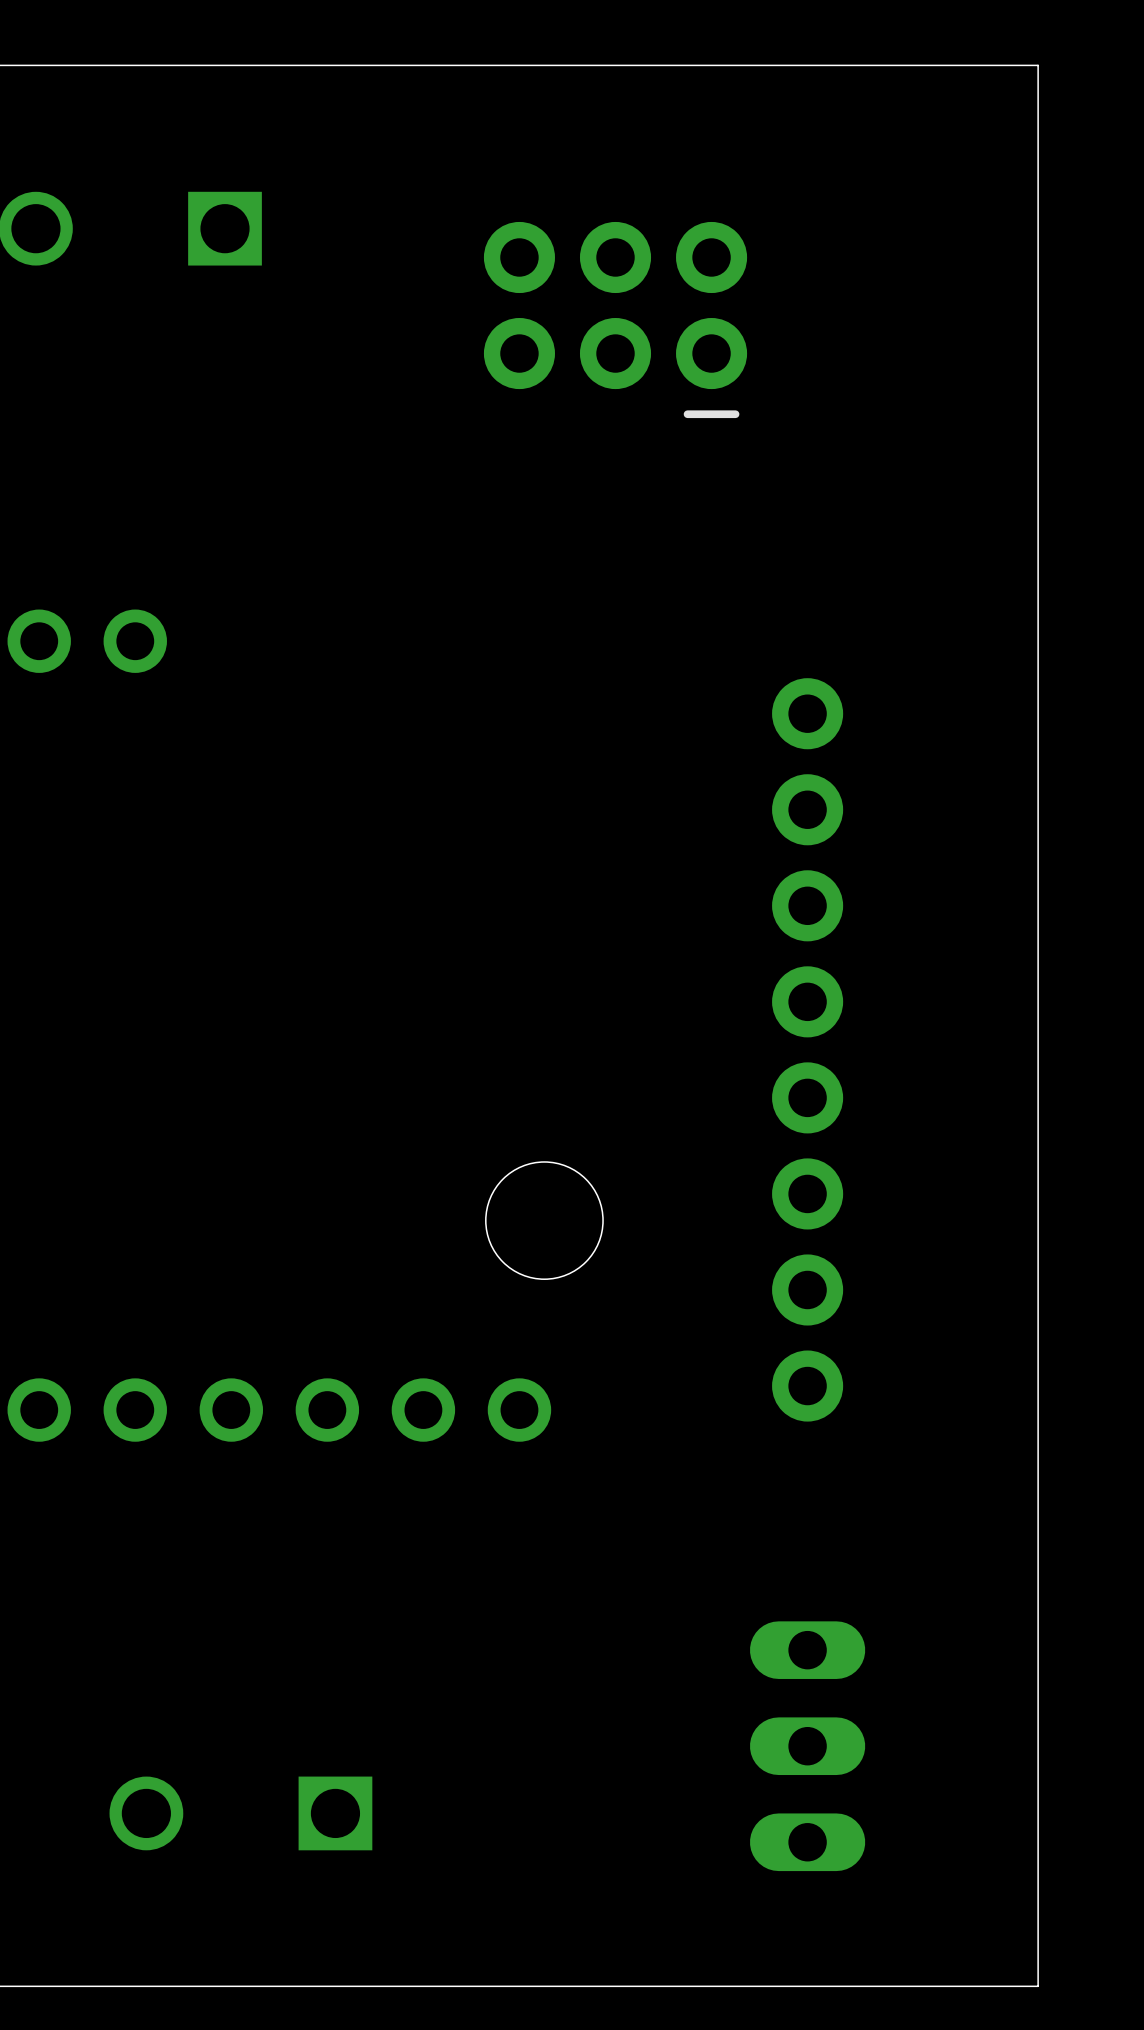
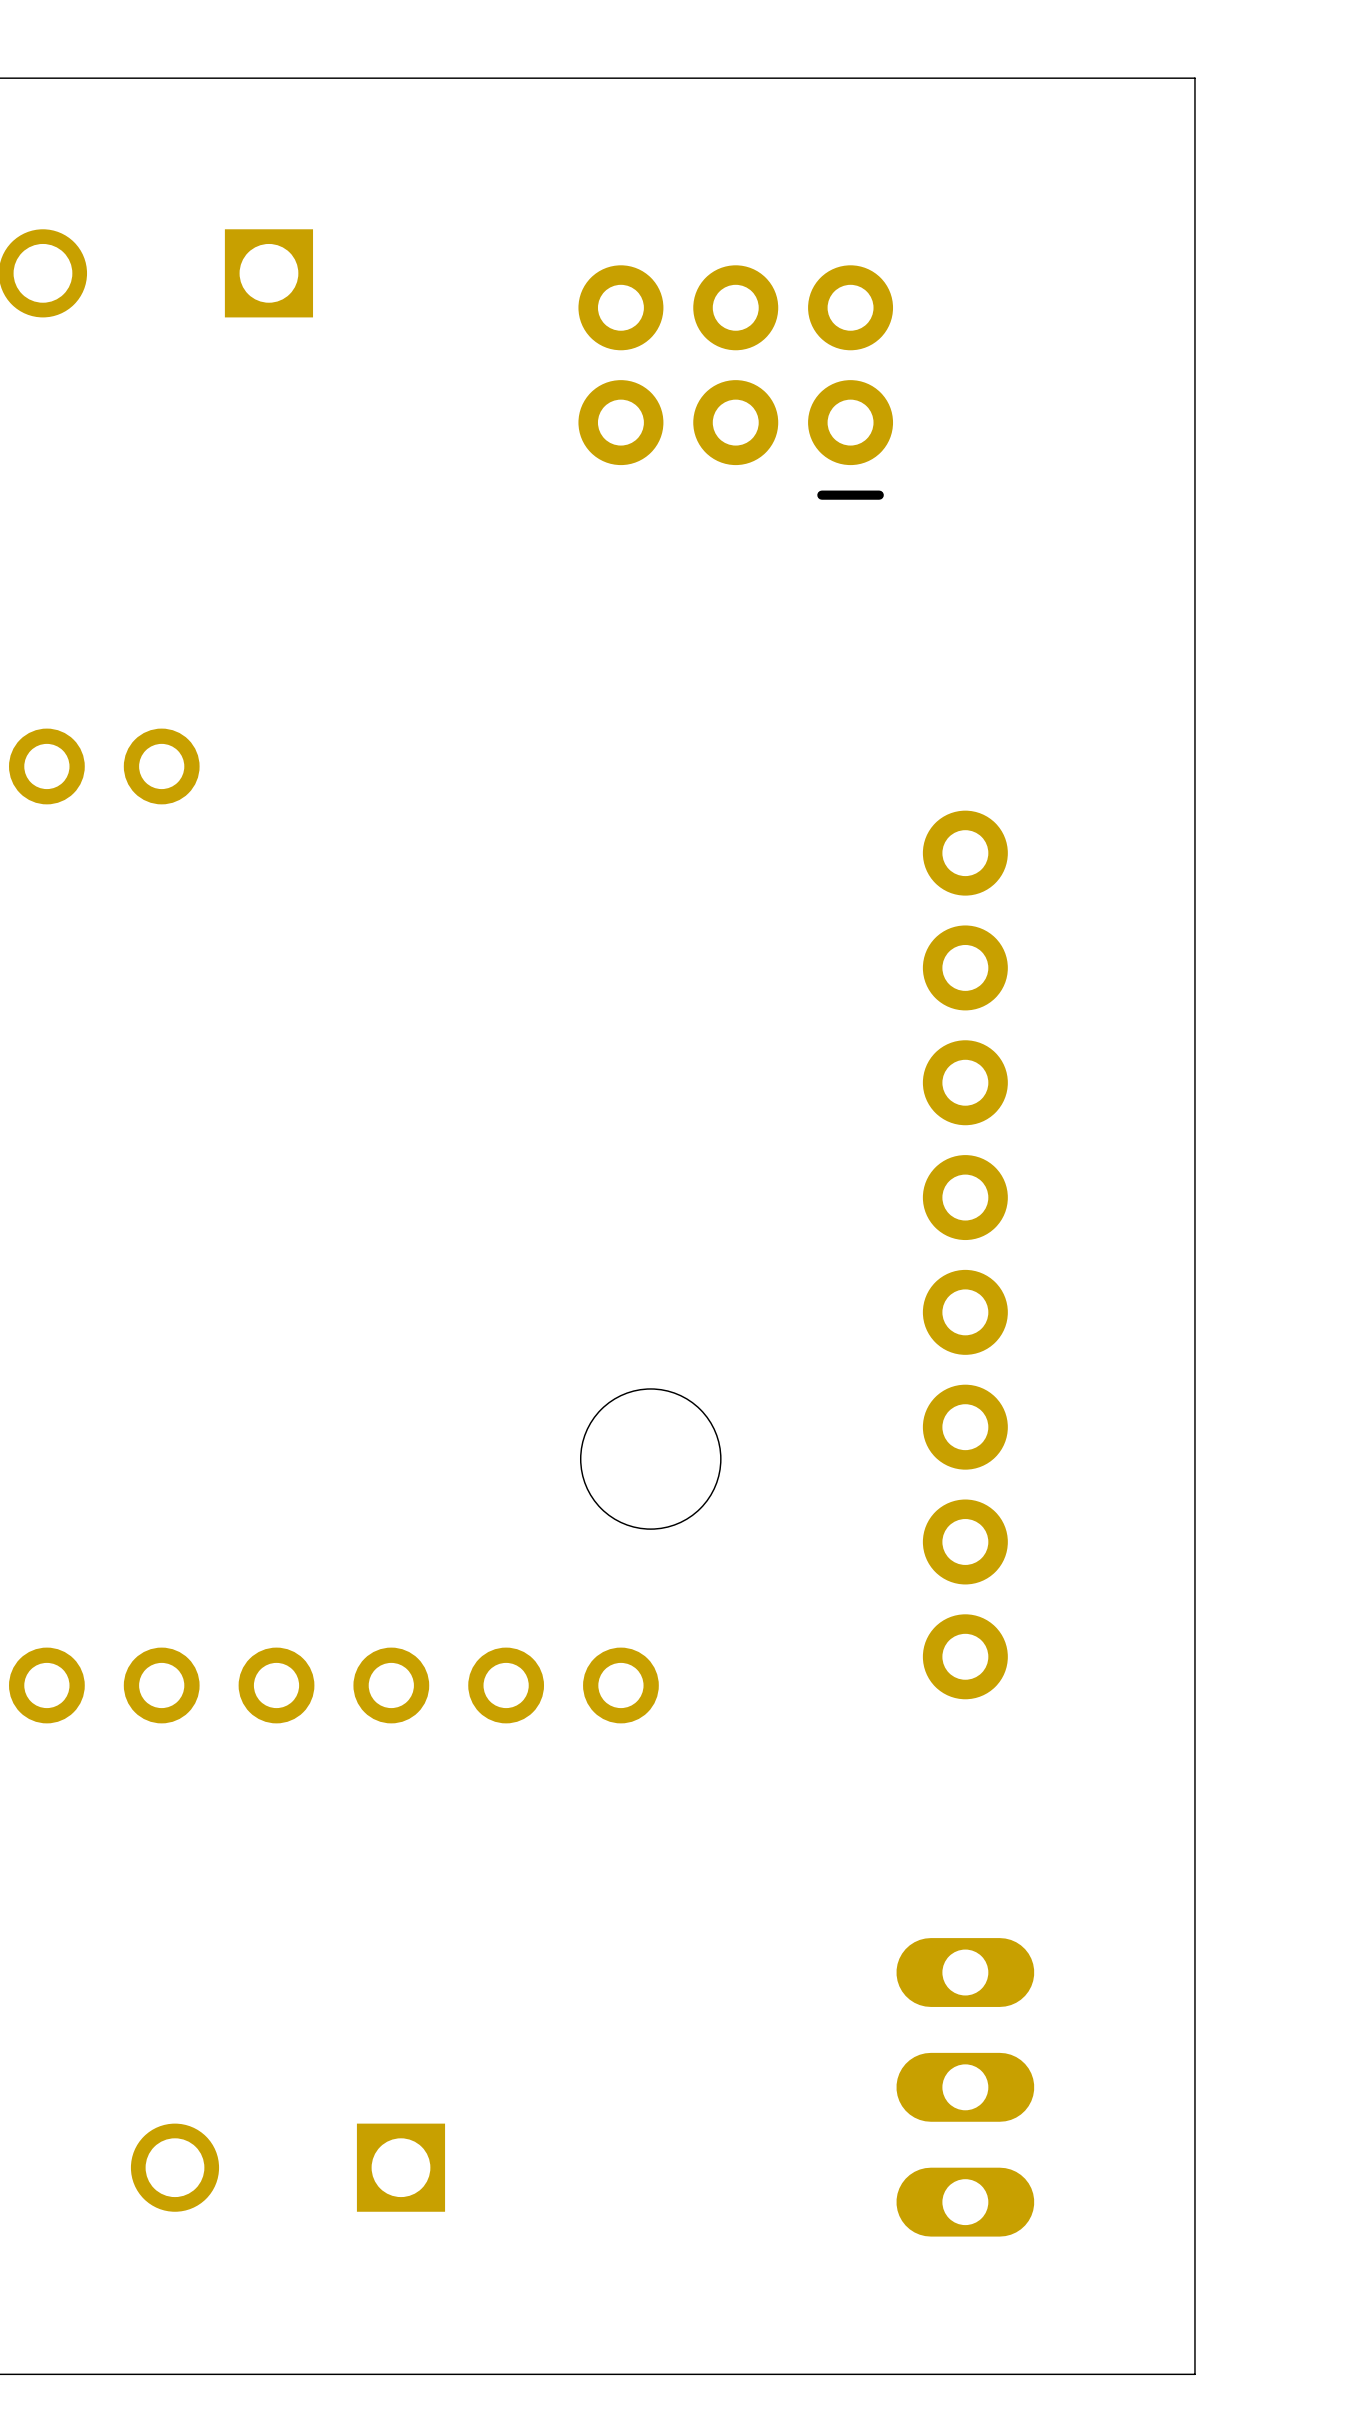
board edge: (999, 65) (1038, 65) (1038, 1986) (999, 1986) -> (1194, 78) (1194, 2374)

